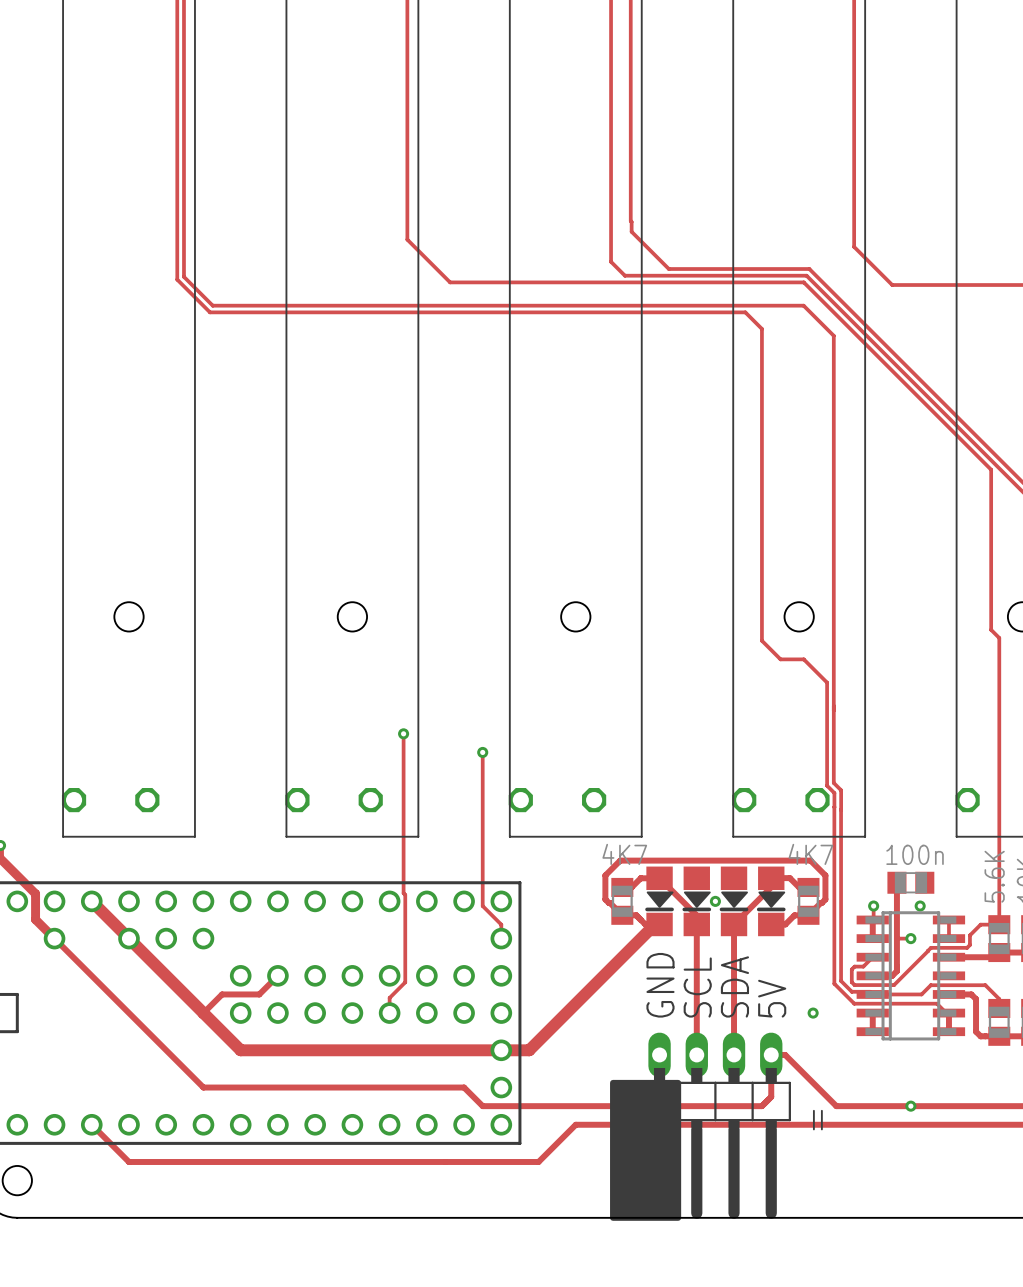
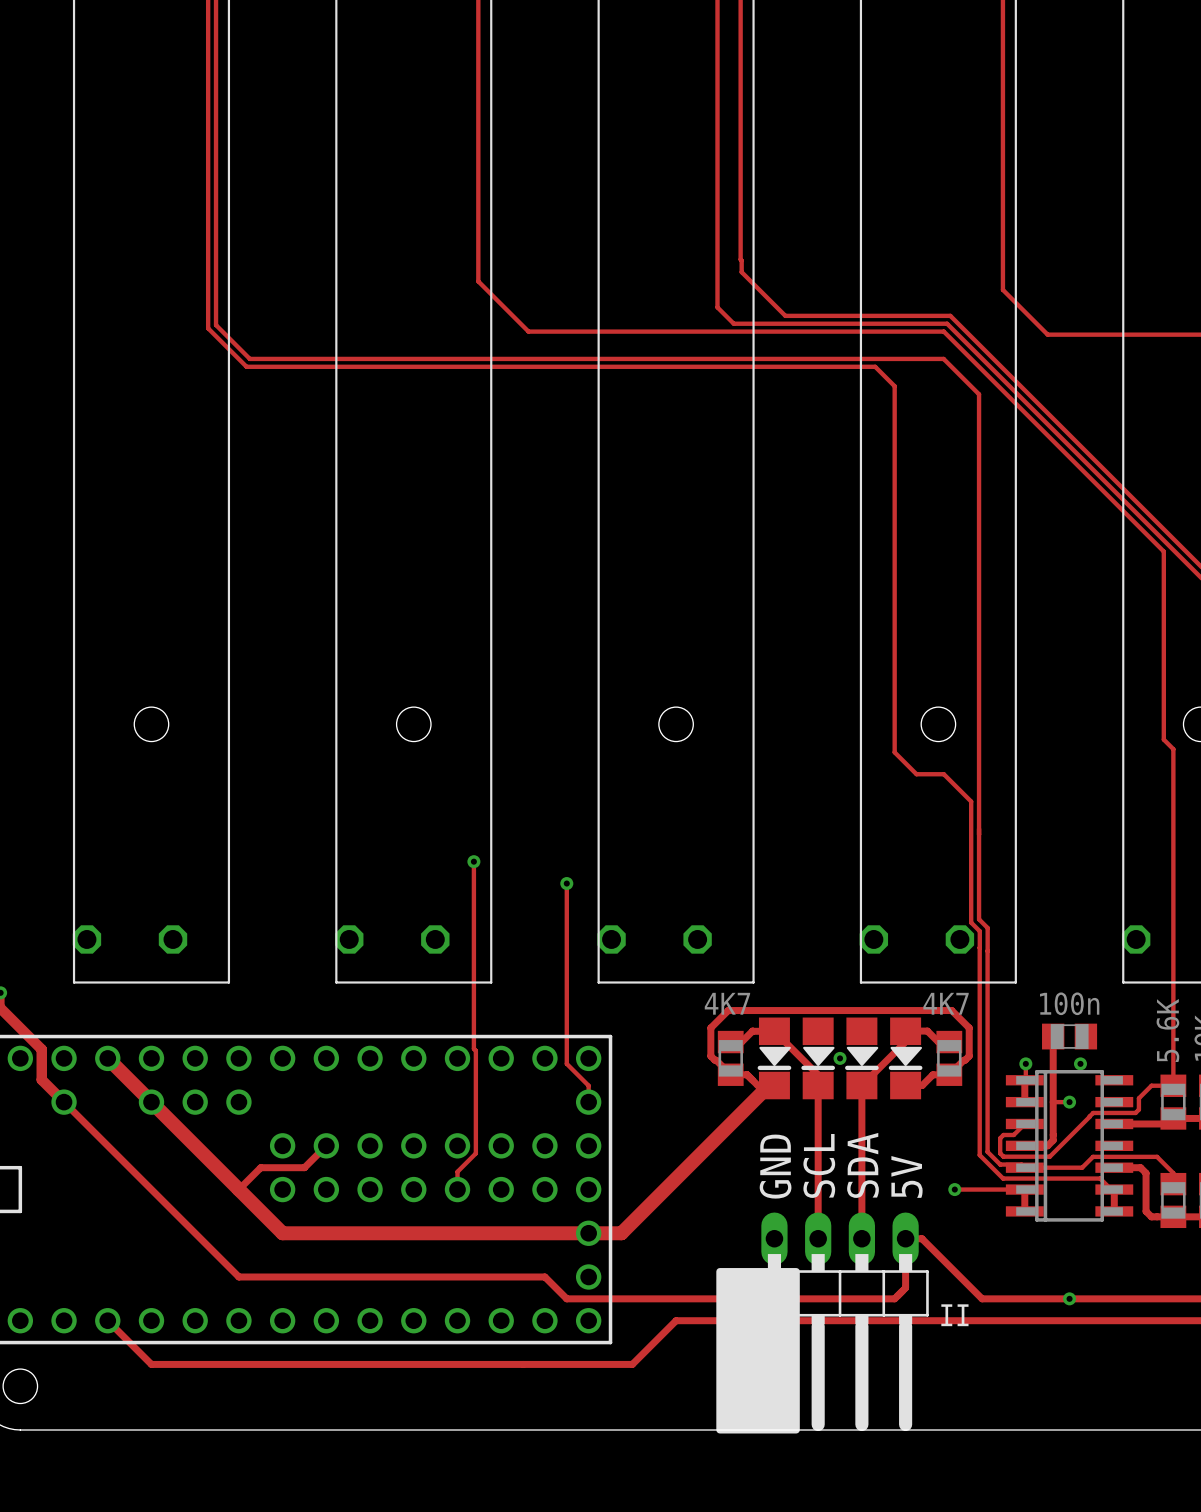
track: (948, 919) (948, 938) -> none
track: none -> (954, 1189) (1024, 1189)

